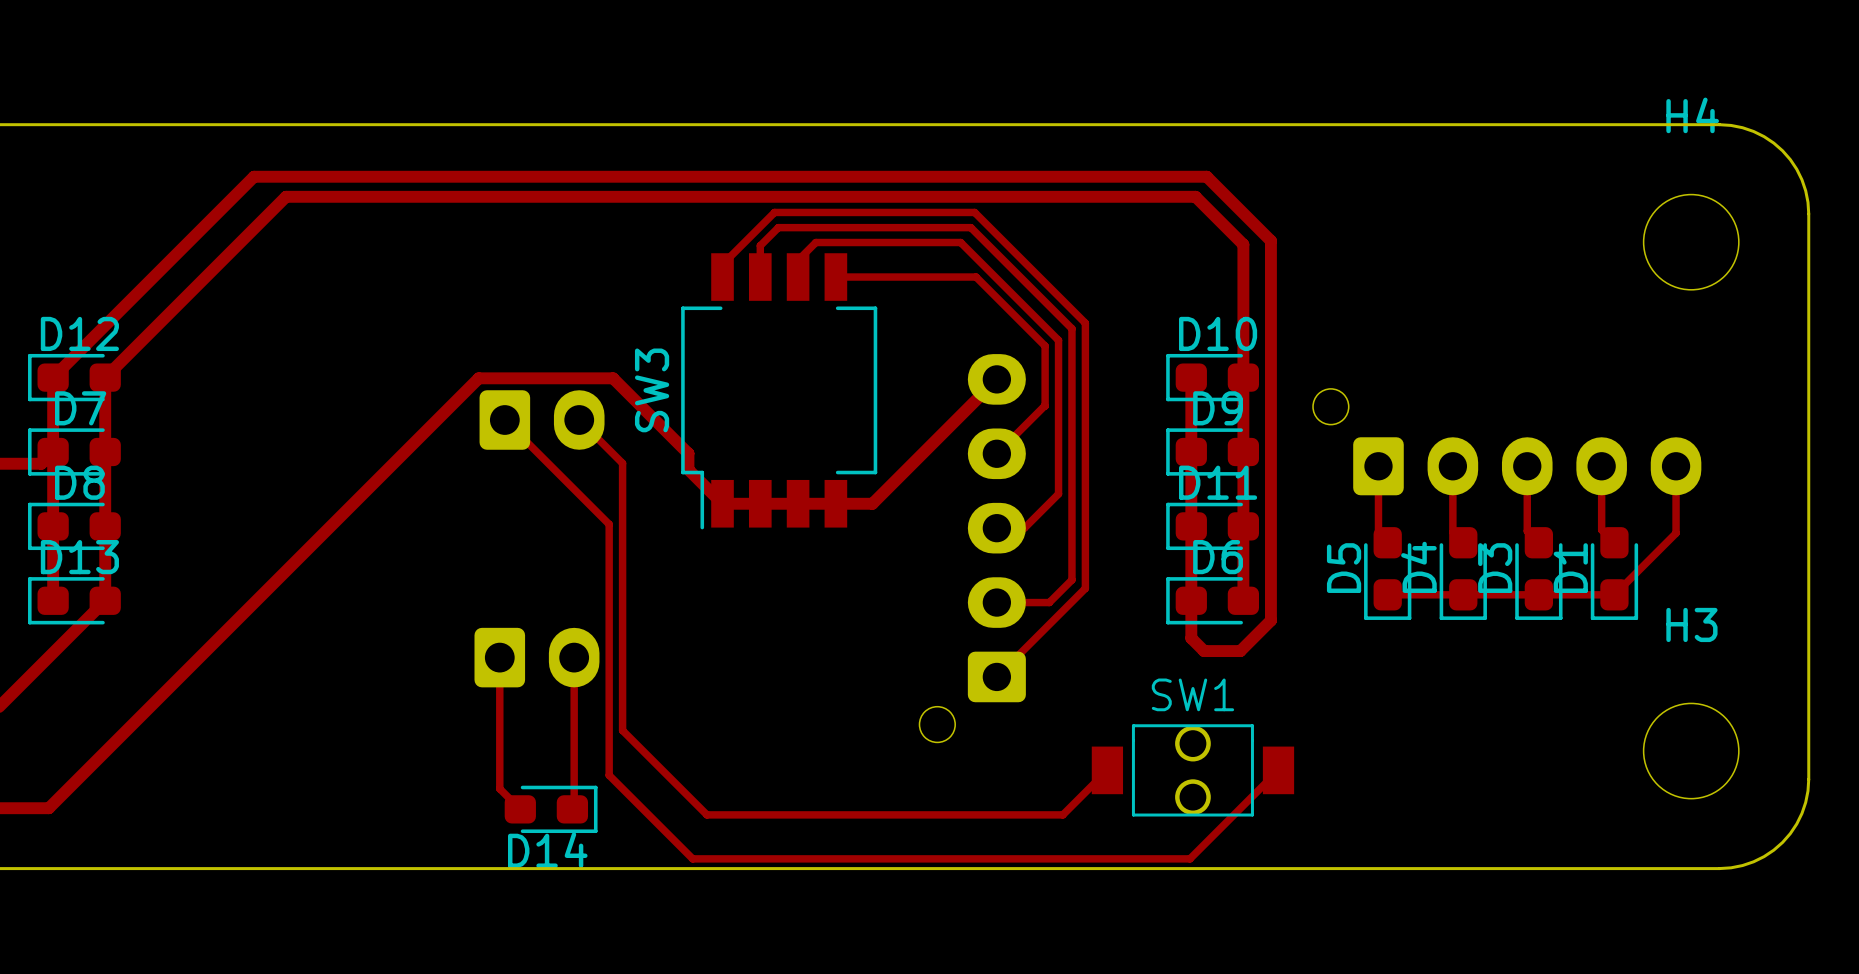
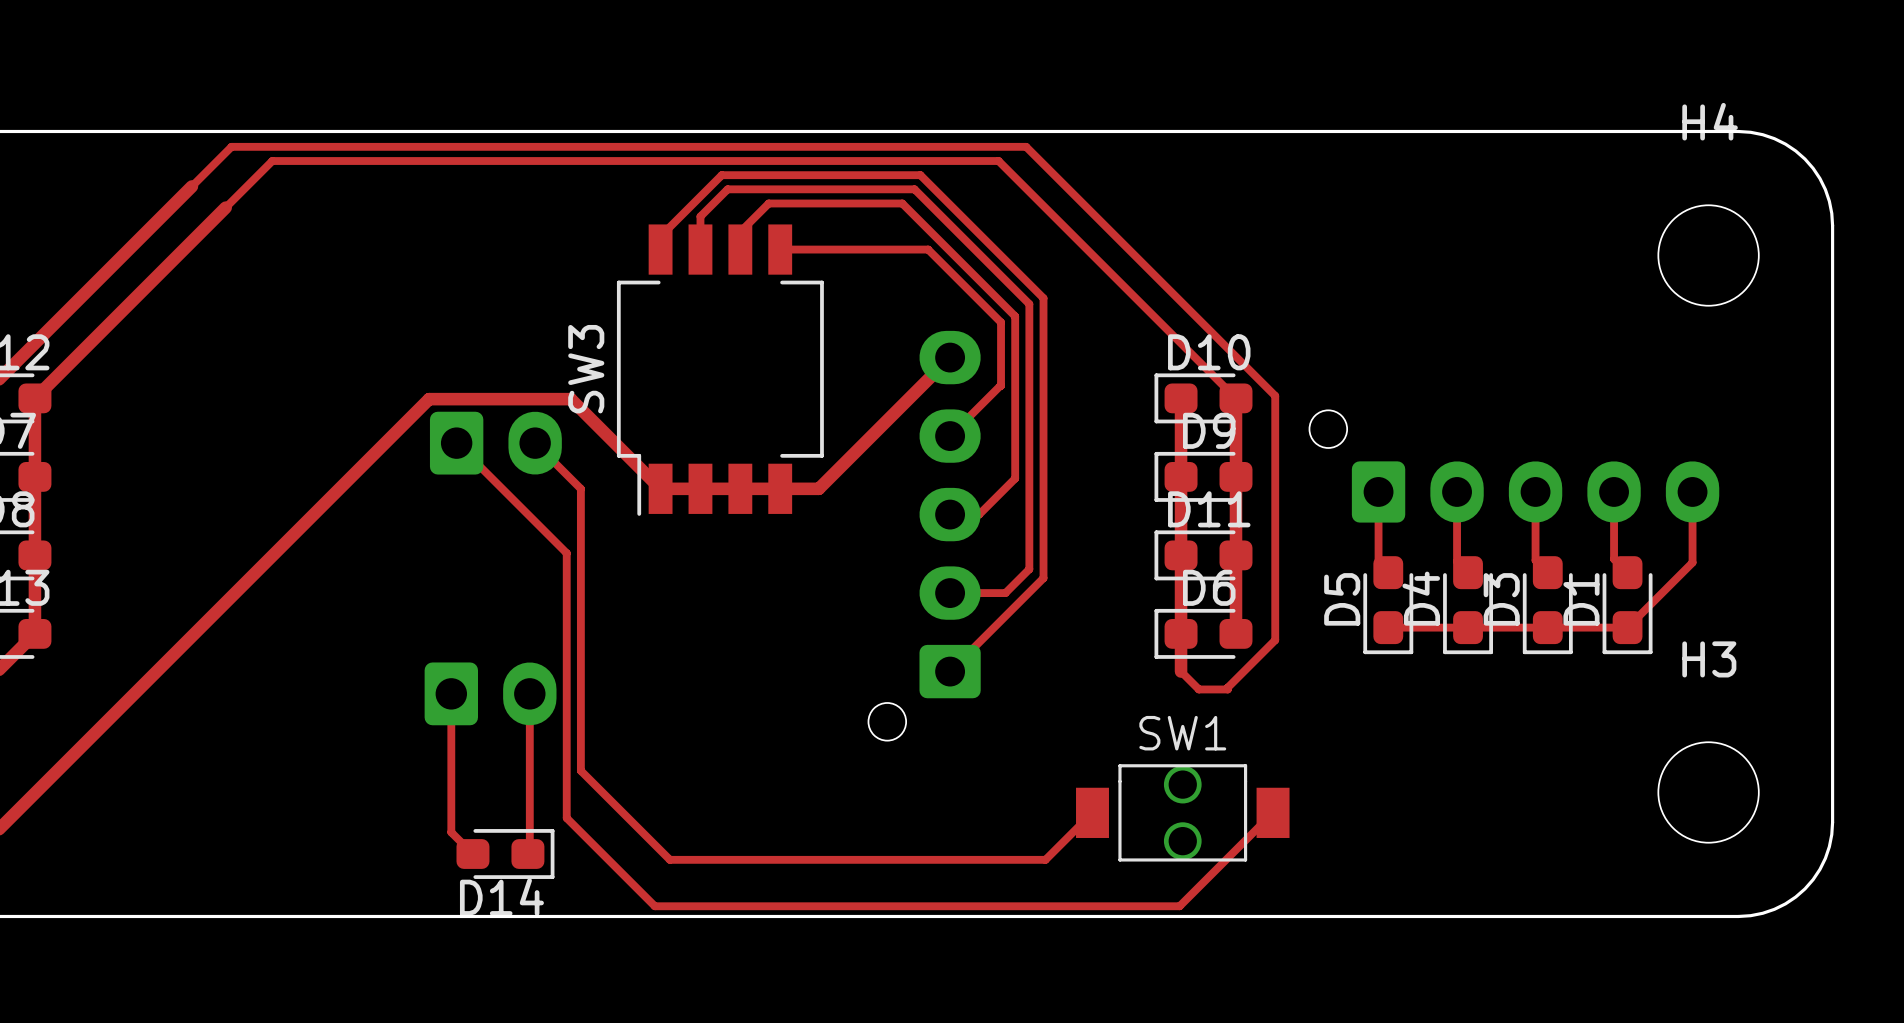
track: (254, 176) (1206, 176) (1270, 240) (1270, 620) (1240, 651) (1204, 651) (1191, 636) -> (191, 186) (231, 146) (1026, 146) (1275, 395) (1275, 640) (1227, 689) (1198, 689) (1181, 671)
track: (286, 196) (1195, 196) (1243, 244) (1243, 377) -> (225, 207) (272, 161) (998, 161) (1235, 398)
track: none -> (660, 249) (660, 236) (721, 175) (920, 175) (1043, 298) (1043, 578) (950, 671)
track: none -> (700, 249) (700, 216) (727, 189) (914, 189) (1029, 304) (1029, 569) (1005, 593) (950, 593)
track: none -> (740, 249) (740, 231) (768, 203) (902, 203) (1015, 316) (1015, 478) (979, 514) (950, 514)
track: (722, 277) (722, 264) (774, 212) (974, 212) (1085, 323) (1085, 588) (996, 676) -> none
track: (760, 277) (760, 245) (778, 227) (970, 227) (1071, 328) (1071, 579) (1049, 602) (996, 602) -> none
track: (798, 277) (798, 260) (815, 242) (960, 242) (1058, 340) (1058, 494) (1024, 528) (996, 528) -> none
track: (835, 277) (976, 277) (1045, 346) (1045, 406) (996, 453) -> (780, 249) (928, 249) (1001, 322) (1001, 385) (950, 436)
track: (996, 379) (872, 503) (722, 503) (688, 469) (688, 453) -> (950, 357) (818, 488) (660, 488) (650, 478)
SW3 position: (779, 391) -> (720, 370)
part position: (972, 548) -> (924, 535)

